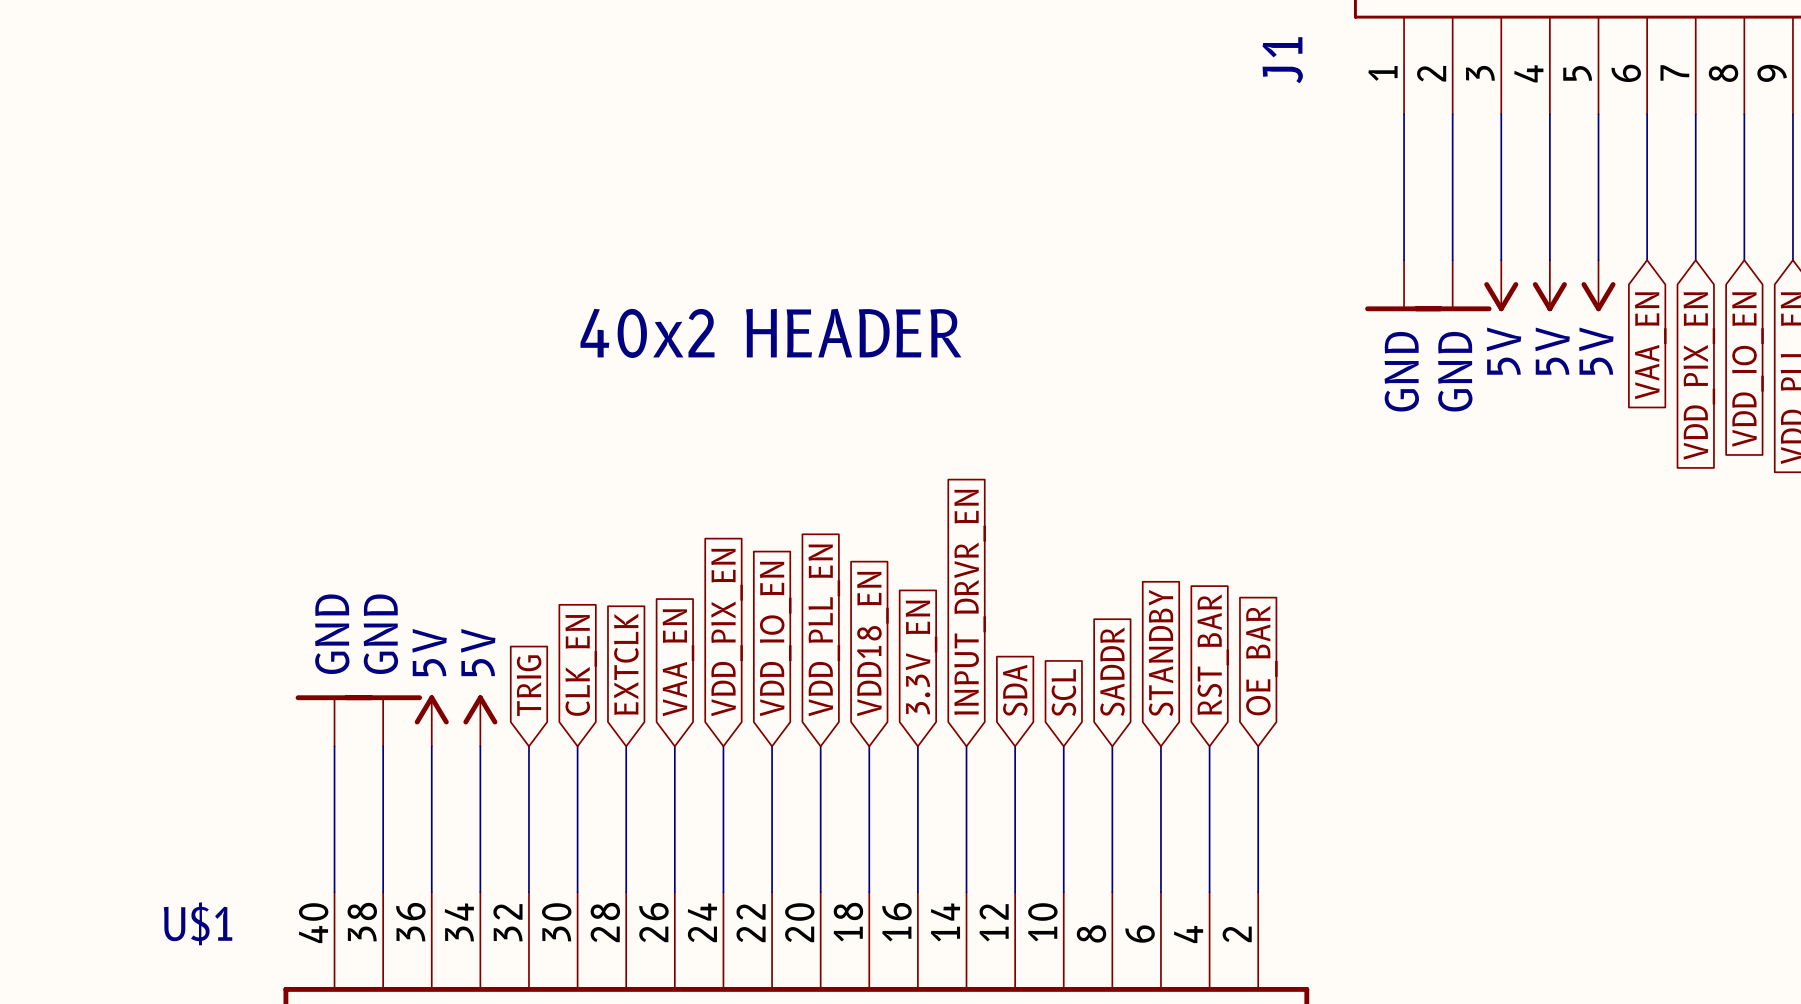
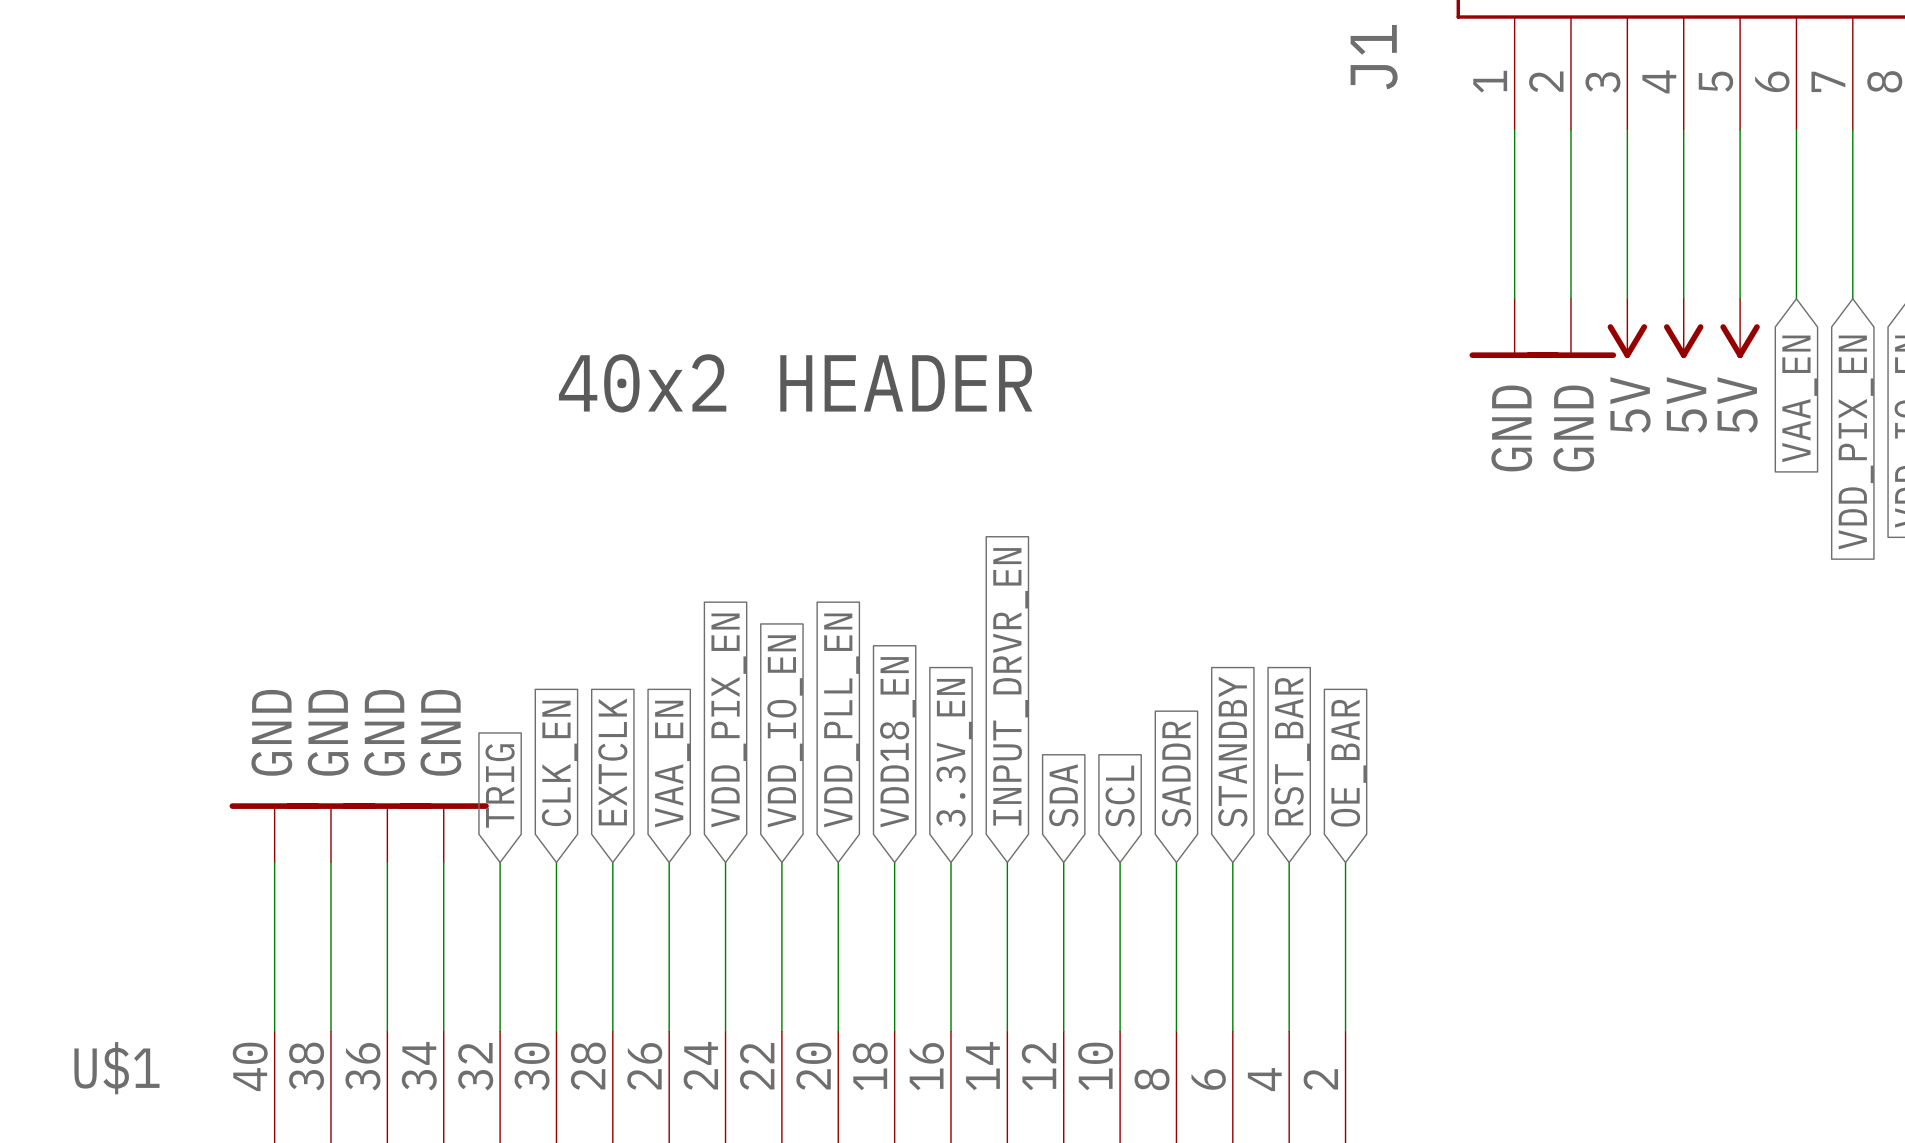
power symbol: 5V (431, 720) -> GND (387, 832)
power symbol: 5V (480, 720) -> GND (443, 832)

